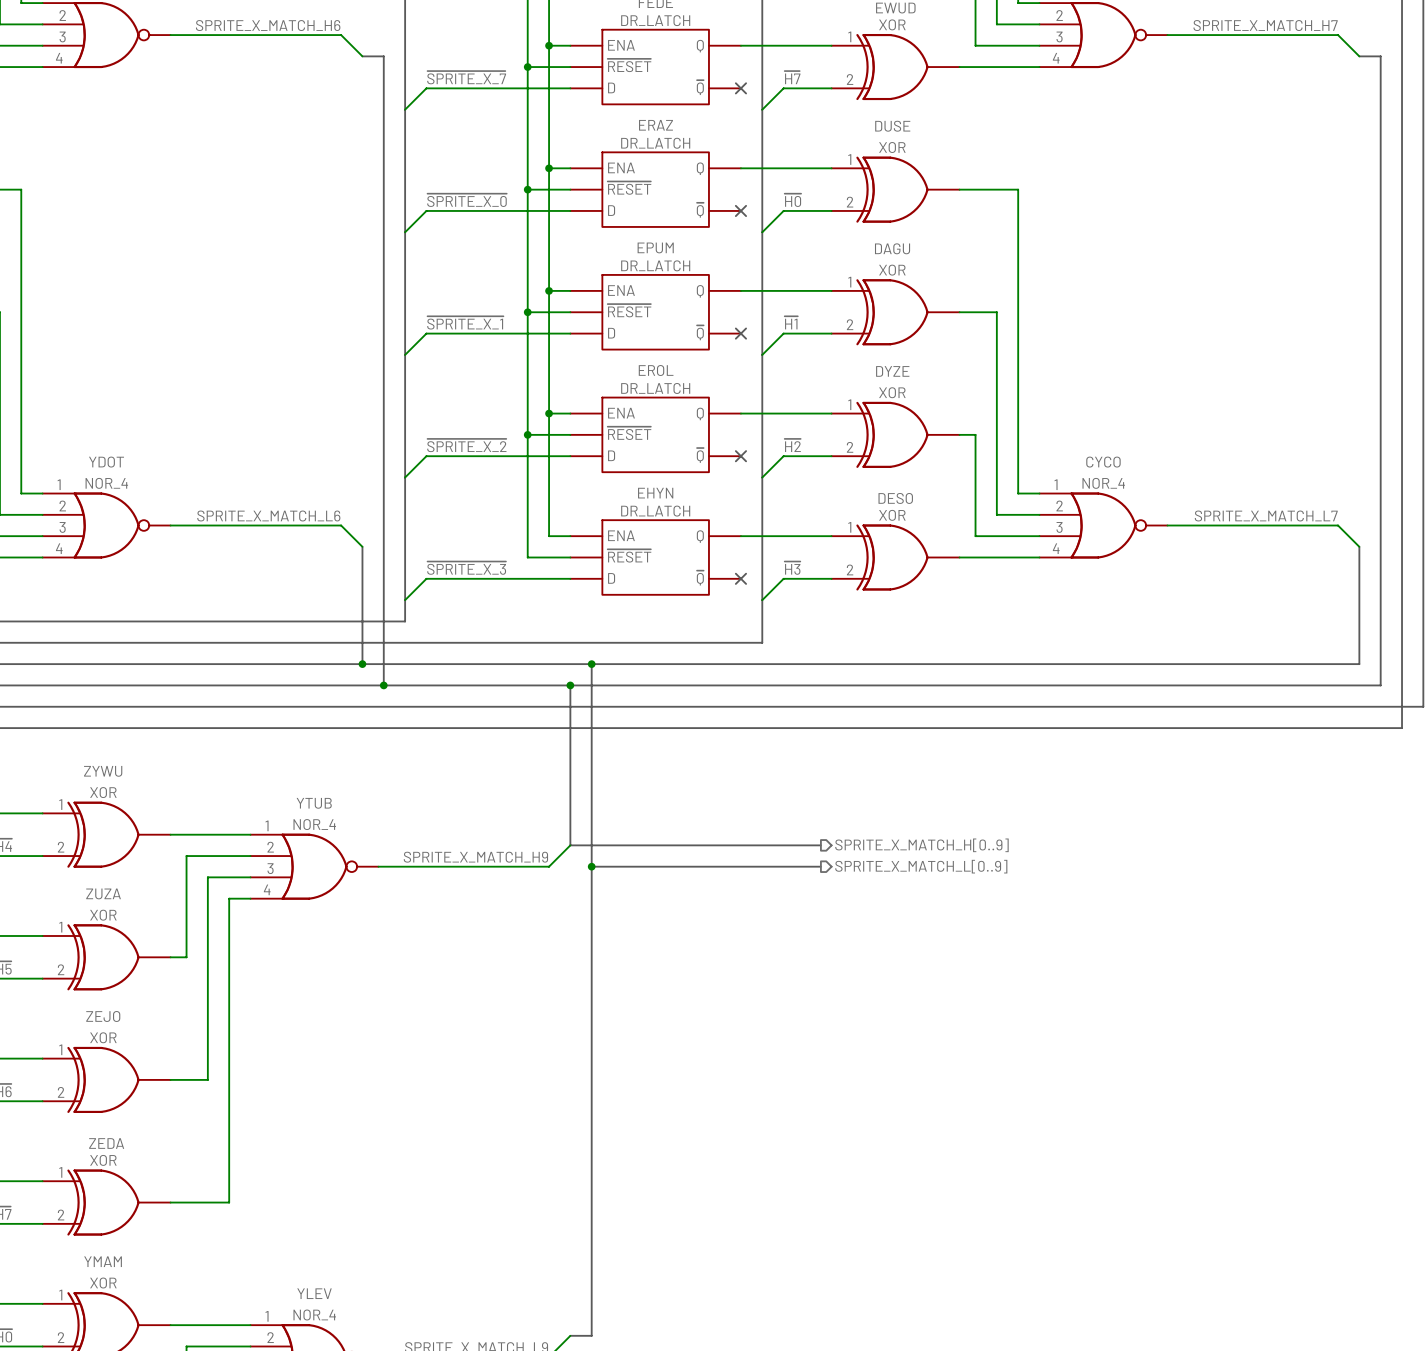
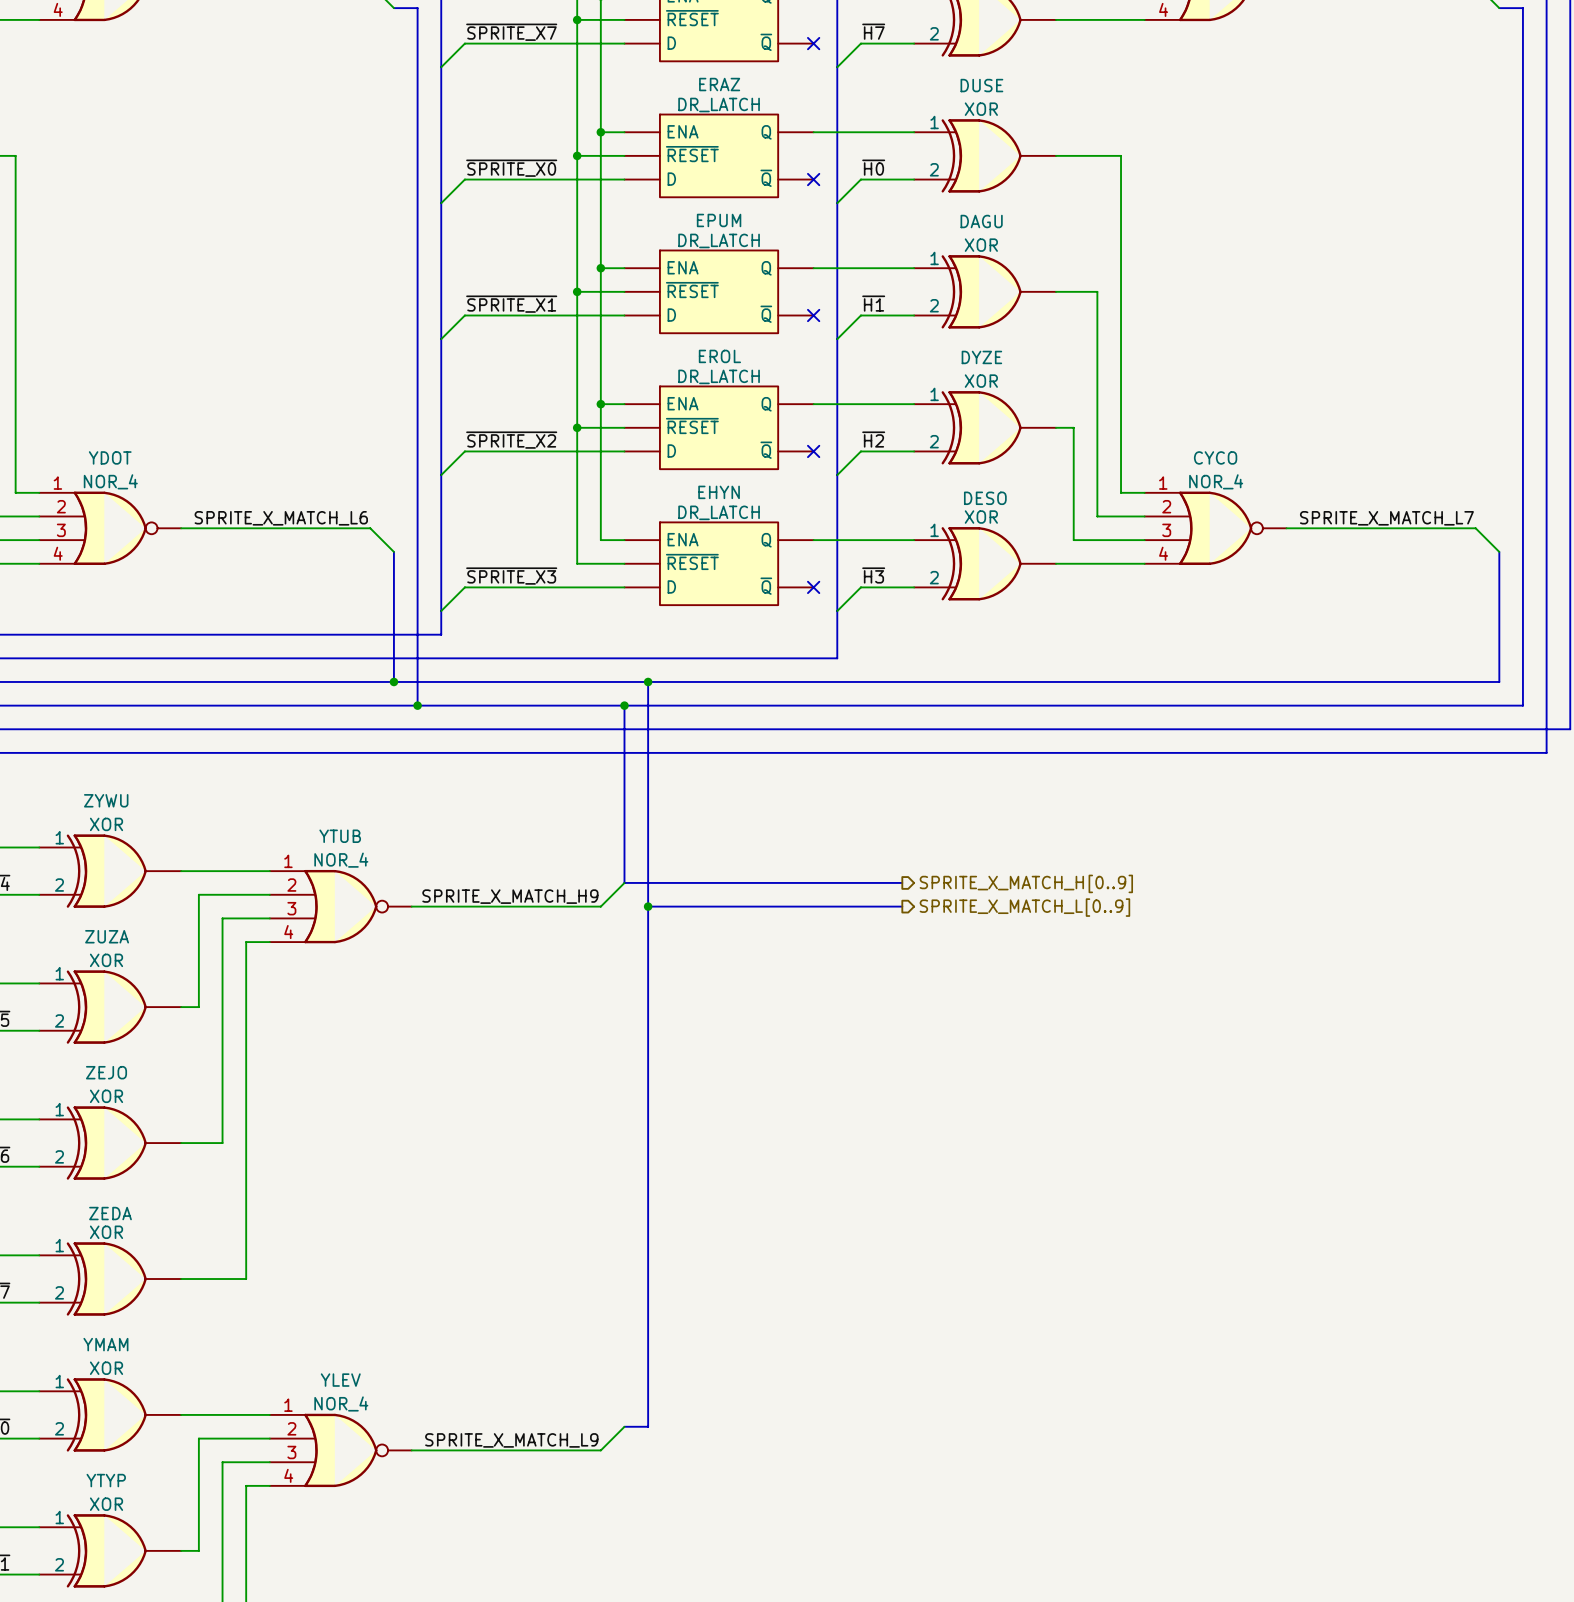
label: ~{SPRITE_X_7} (466, 77) -> ~{SPRITE_X7} (511, 32)
label: ~{SPRITE_X_0} (466, 200) -> ~{SPRITE_X0} (511, 168)
label: ~{SPRITE_X_1} (465, 322) -> ~{SPRITE_X1} (511, 304)
label: ~{SPRITE_X_2} (466, 445) -> ~{SPRITE_X2} (511, 440)
label: ~{SPRITE_X_3} (466, 568) -> ~{SPRITE_X3} (511, 576)

